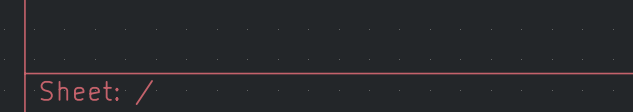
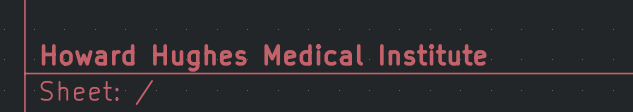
title block: none -> Howard Hughes Medical Institute (264, 57)

